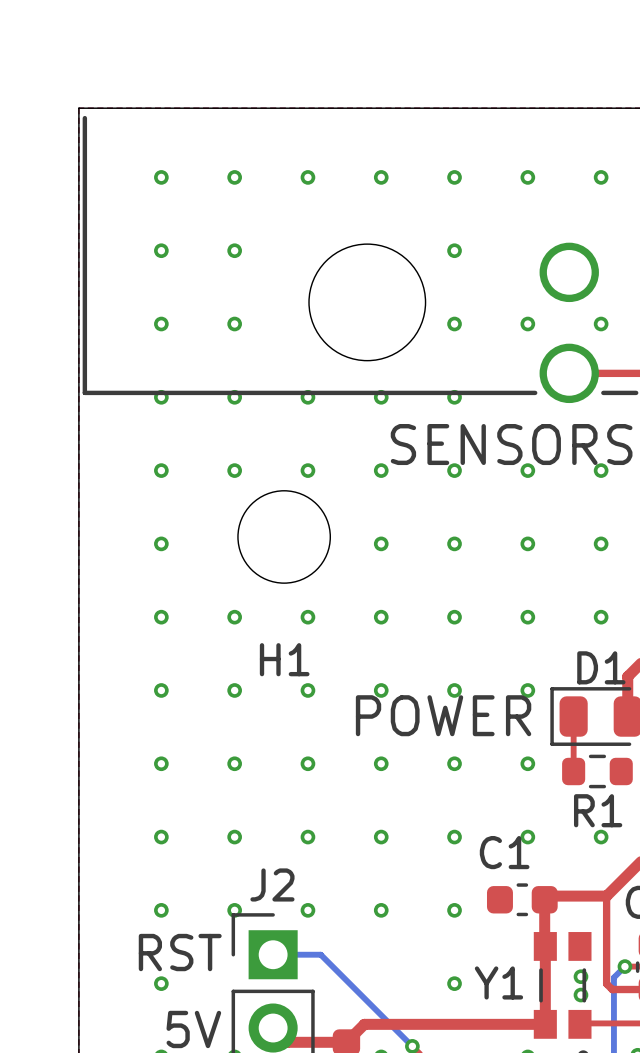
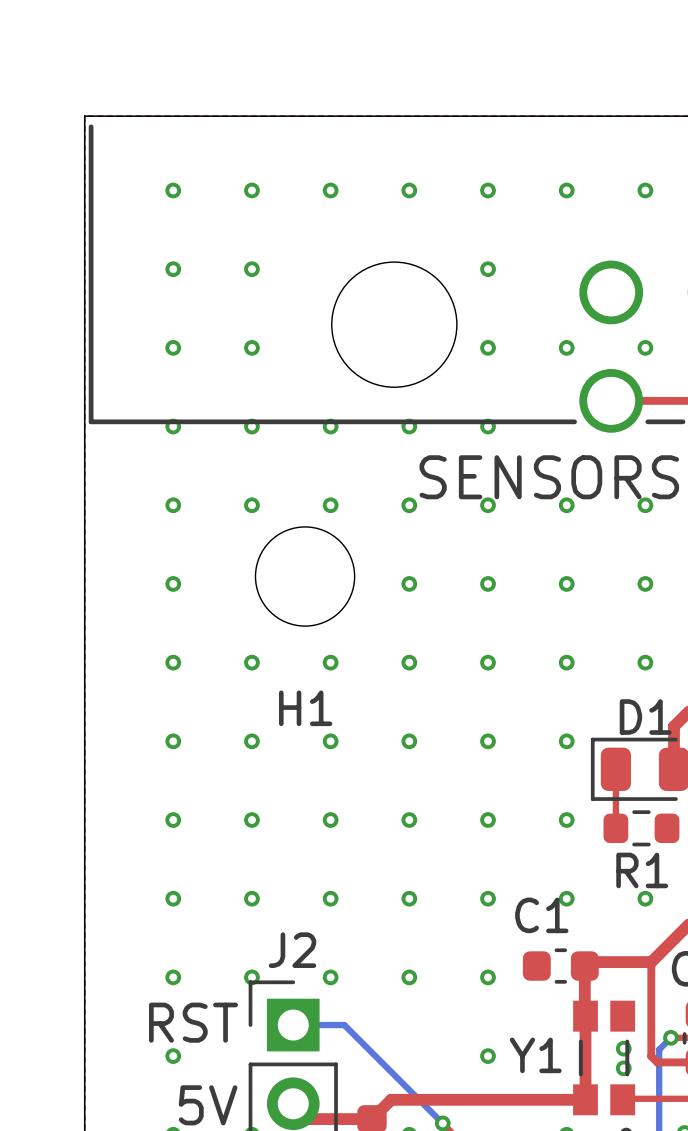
text: POWER (443, 715) -> none

